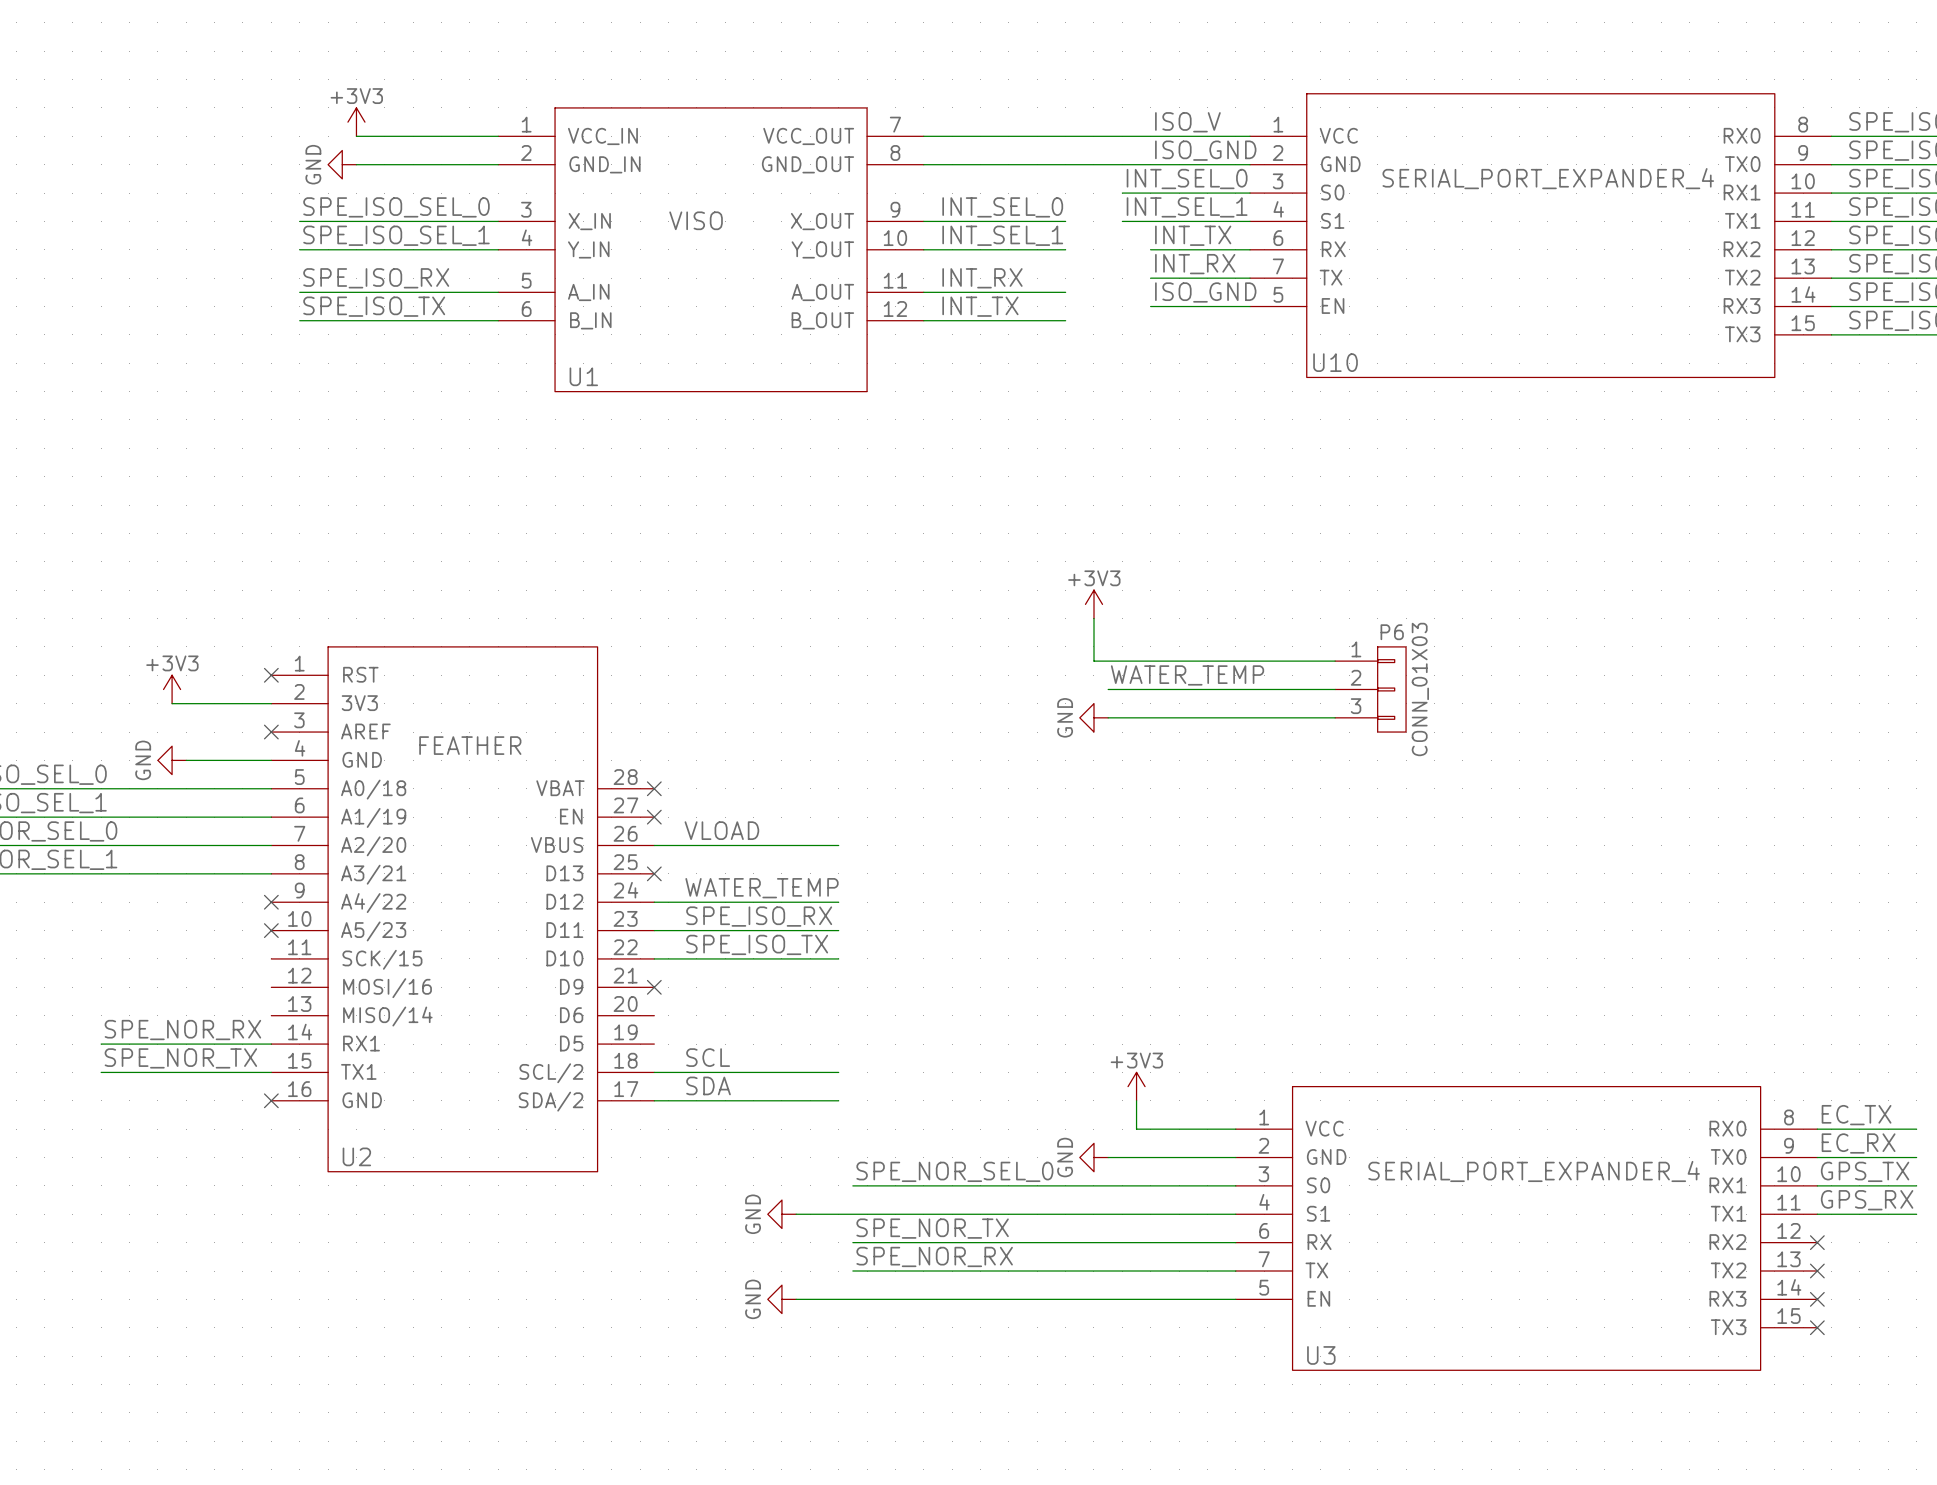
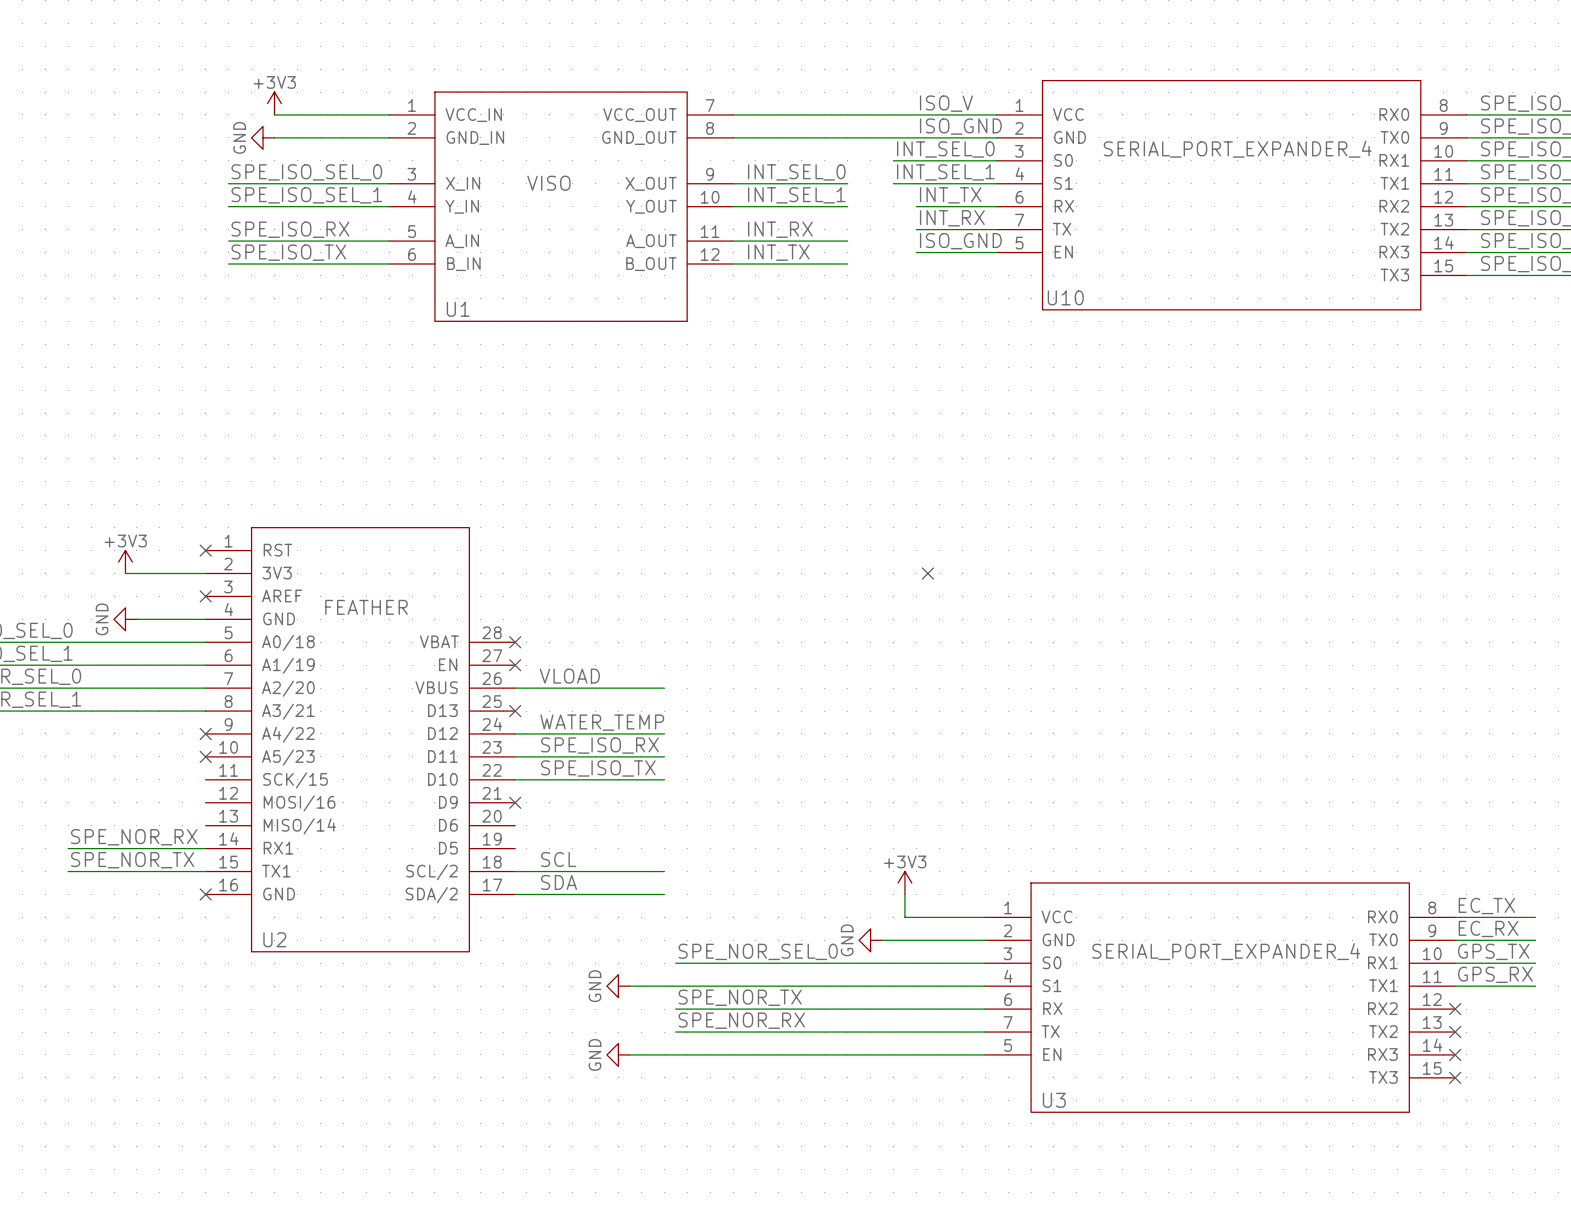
power symbol: +3V3 (1093, 604) -> none
wire: (1093, 618) (1093, 661) (1335, 661) -> none
label: WATER_TEMP (1187, 675) -> none
wire: (1108, 689) (1335, 689) -> none
P6: CONN_01X03 (1370, 689) -> none
no-connect mark: none -> (927, 573)
power symbol: GND (1093, 717) -> none
wire: (1108, 717) (1335, 717) -> none

